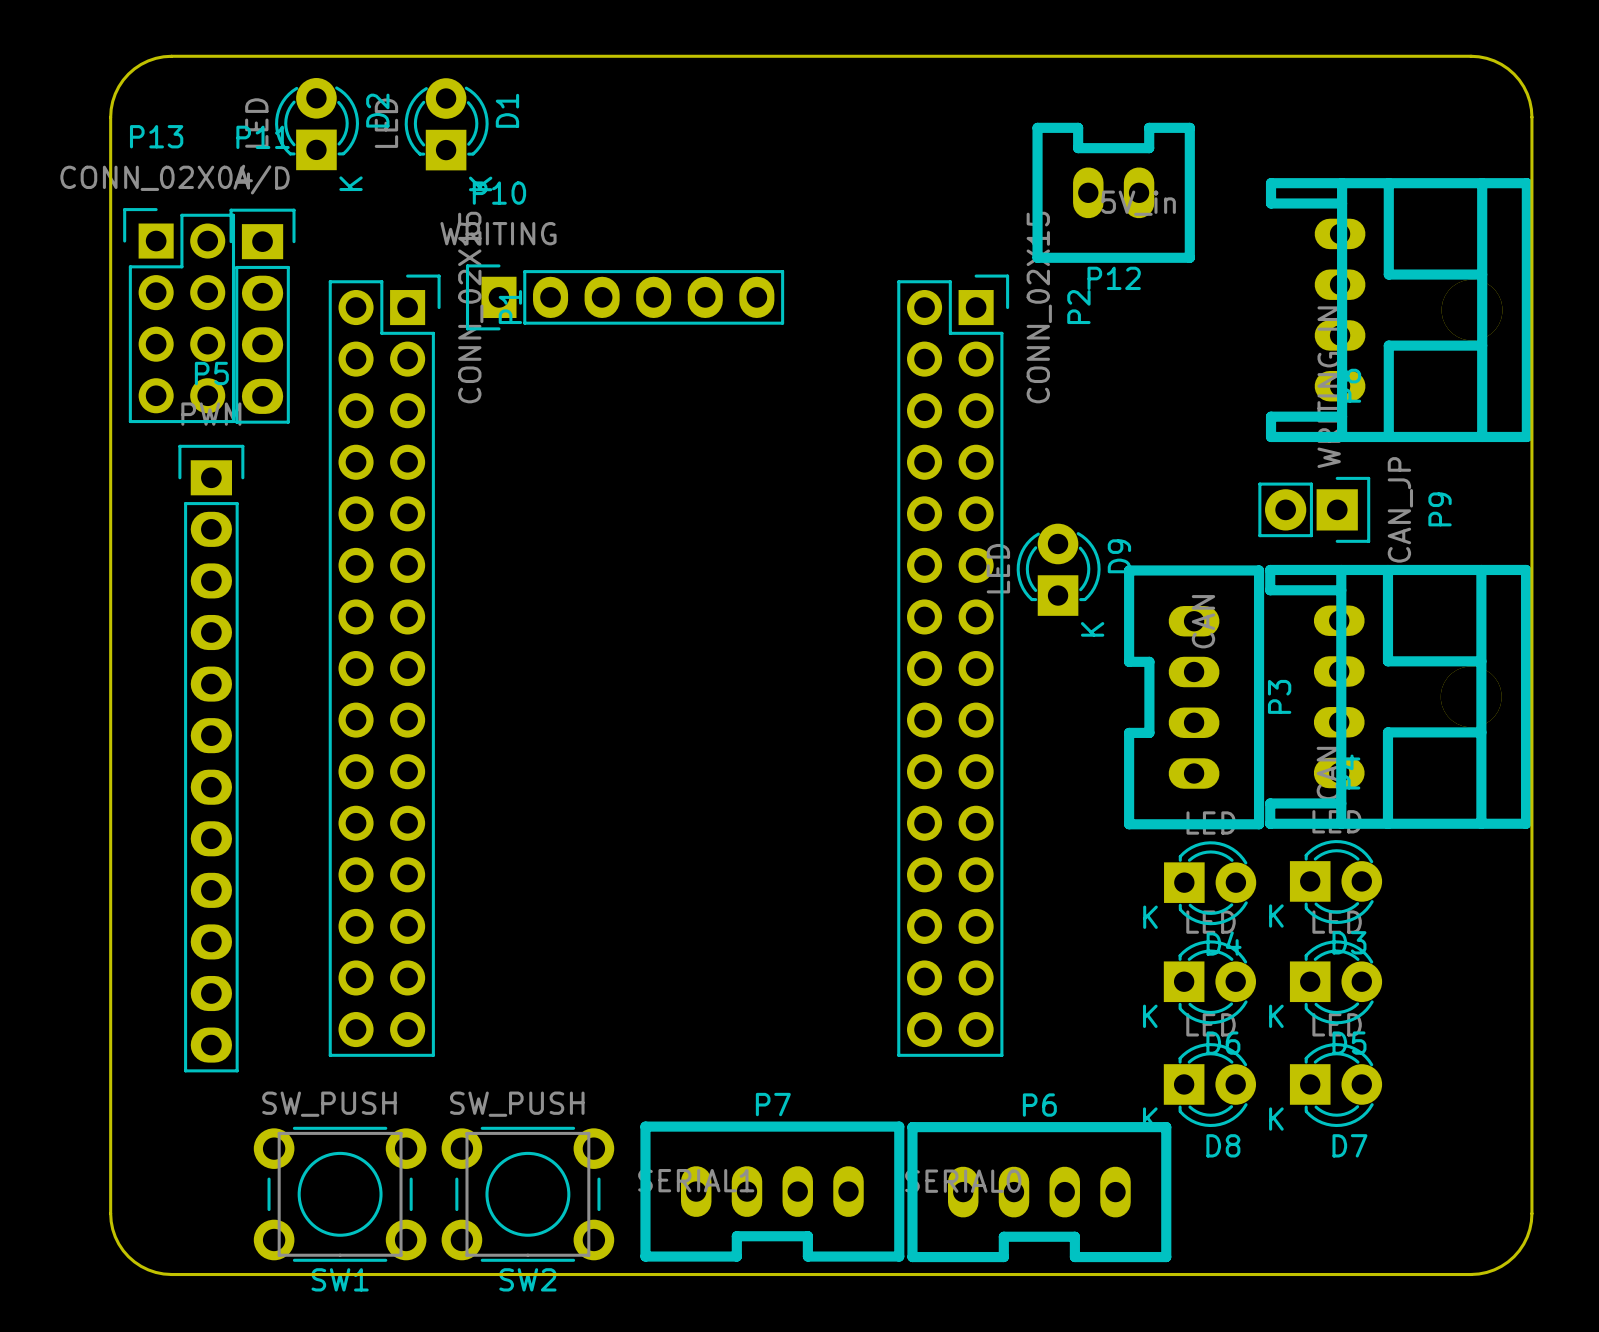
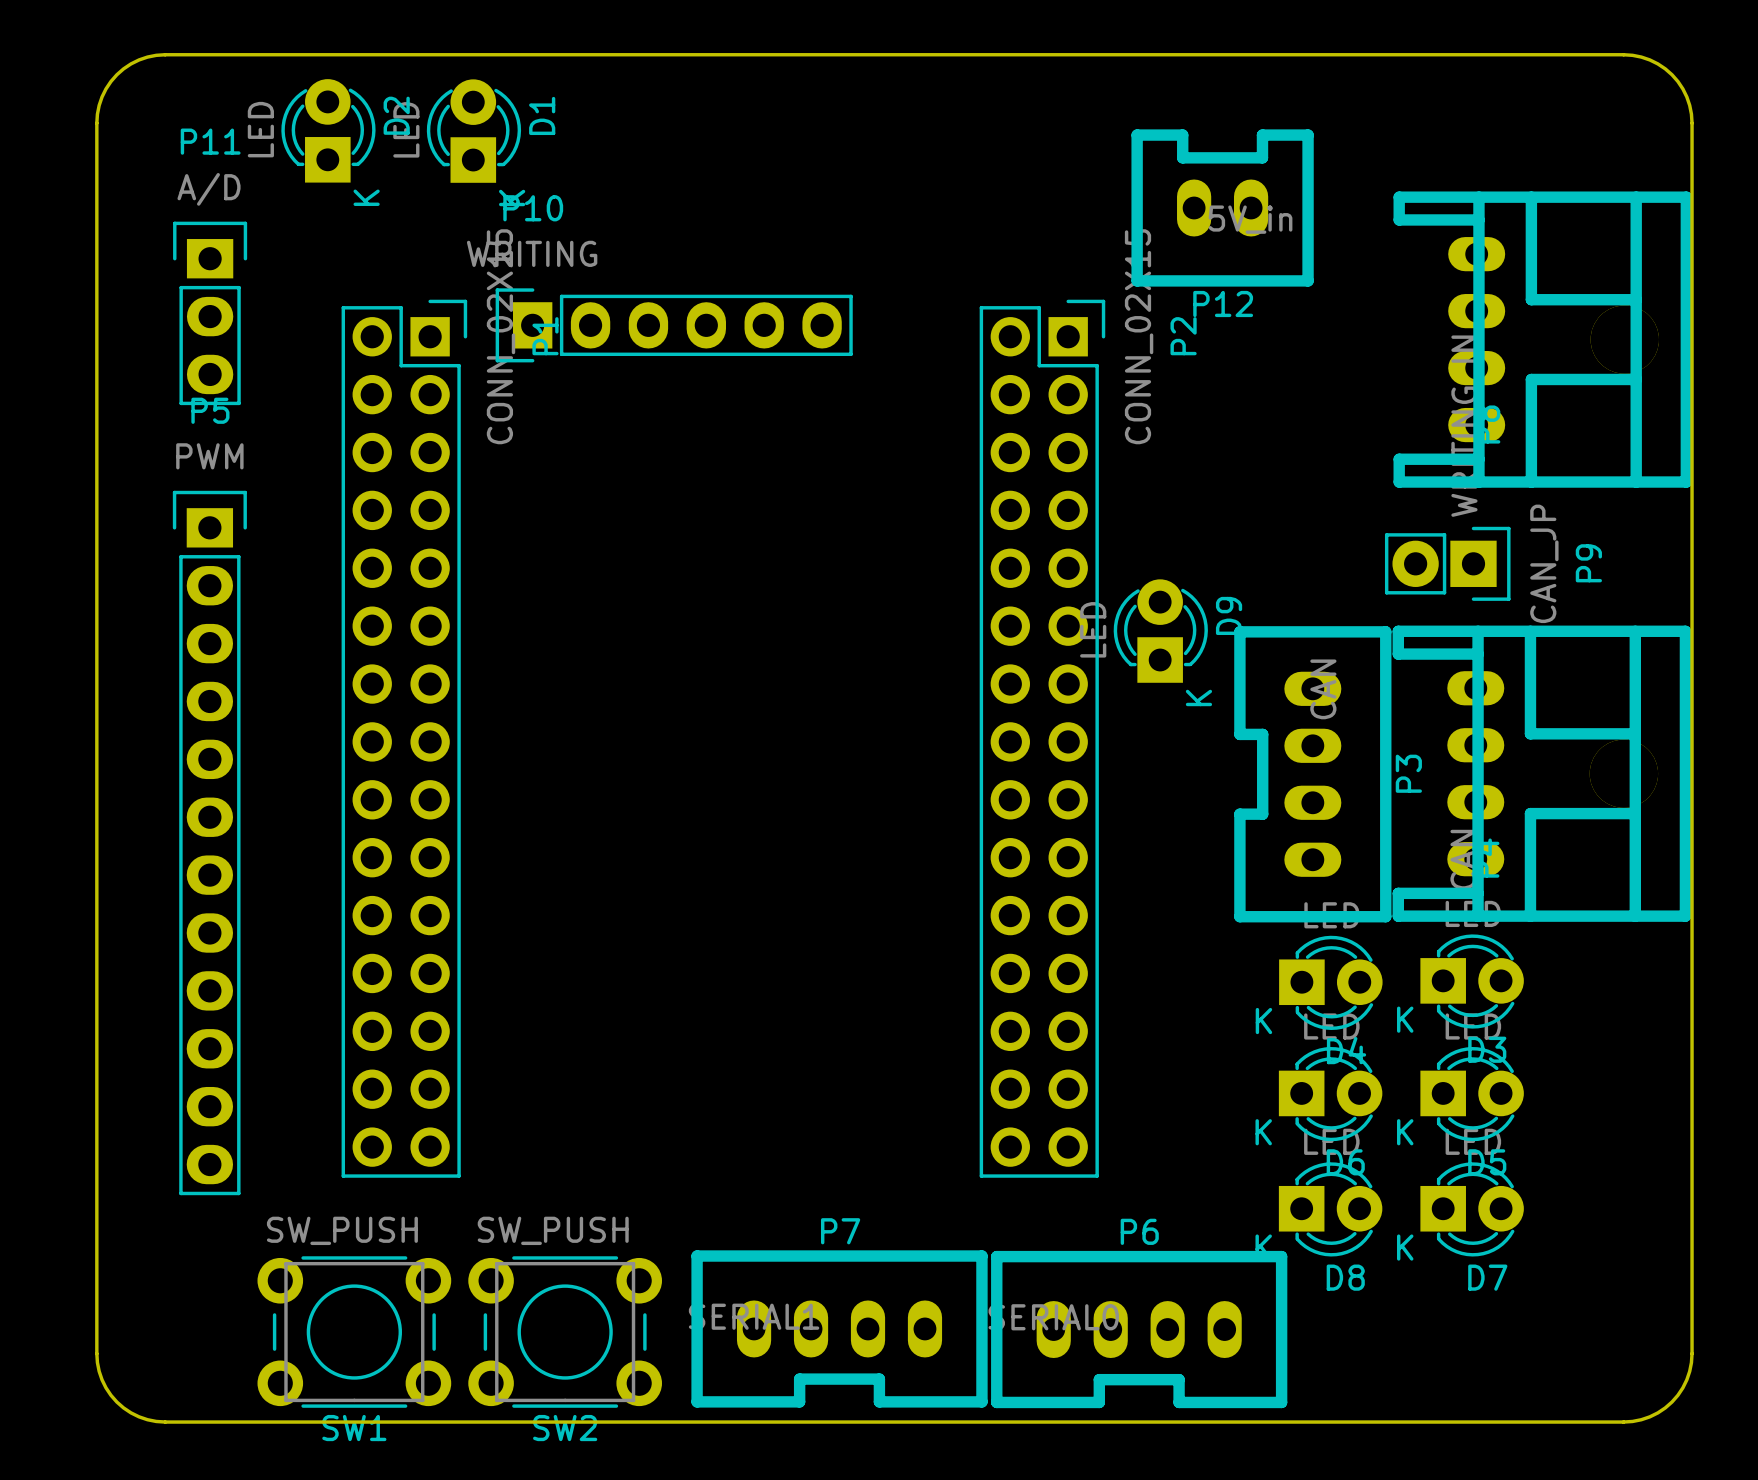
P11 footprint: [229, 208, 296, 424] -> [173, 221, 248, 406]
P13: CONN_02X04 (179, 315) -> none

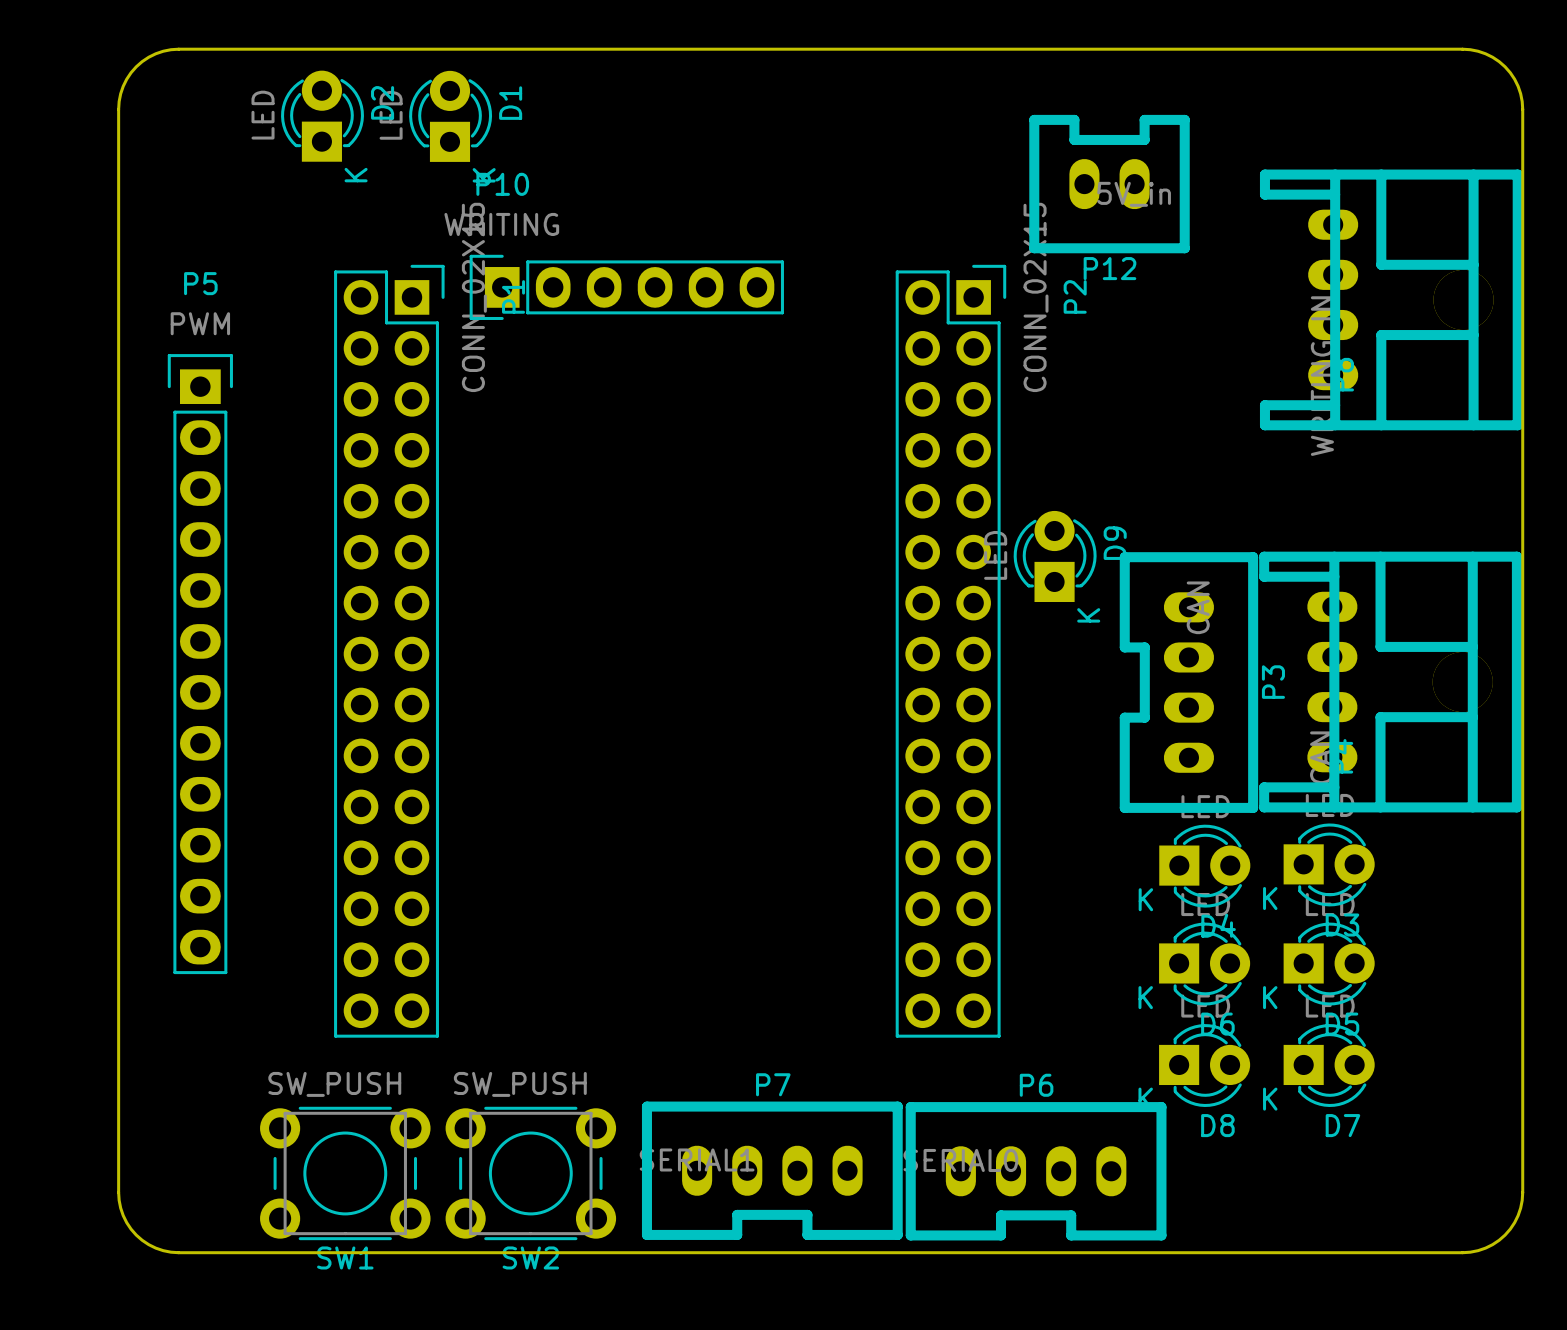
P11: A/D (210, 313) -> none
P9: CAN_JP (1447, 563) -> none
P5 position: (209, 842) -> (200, 664)

